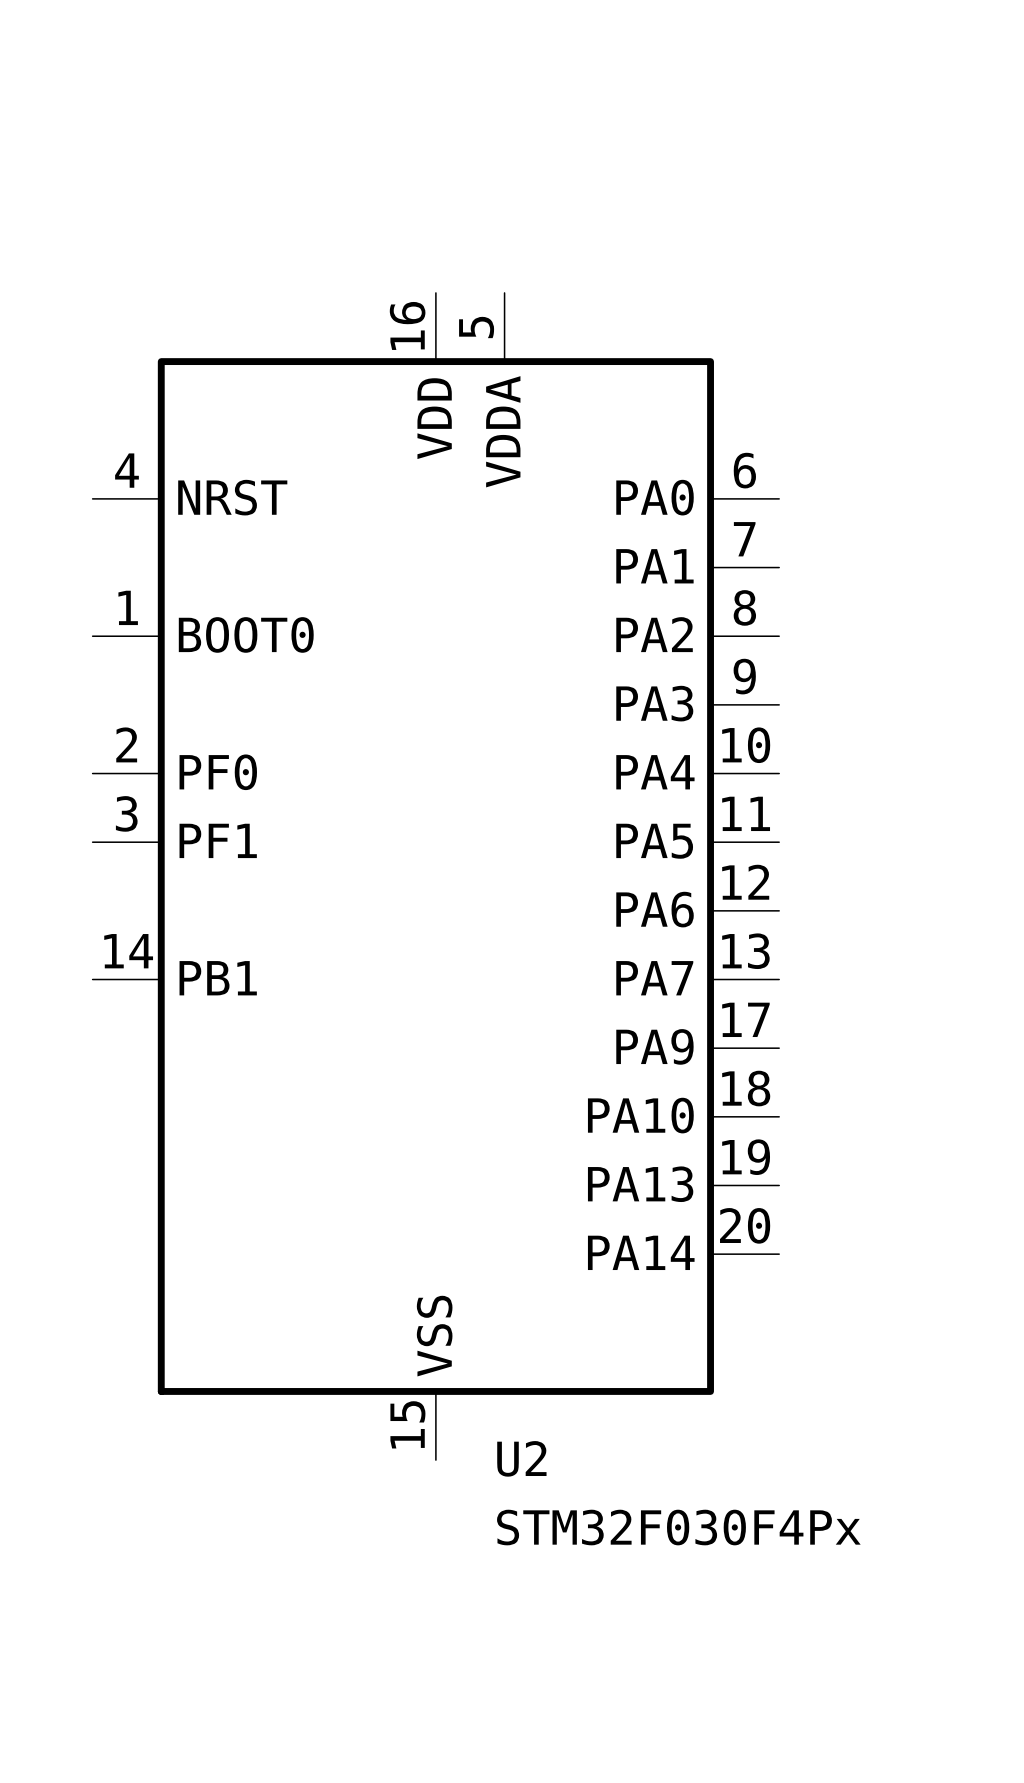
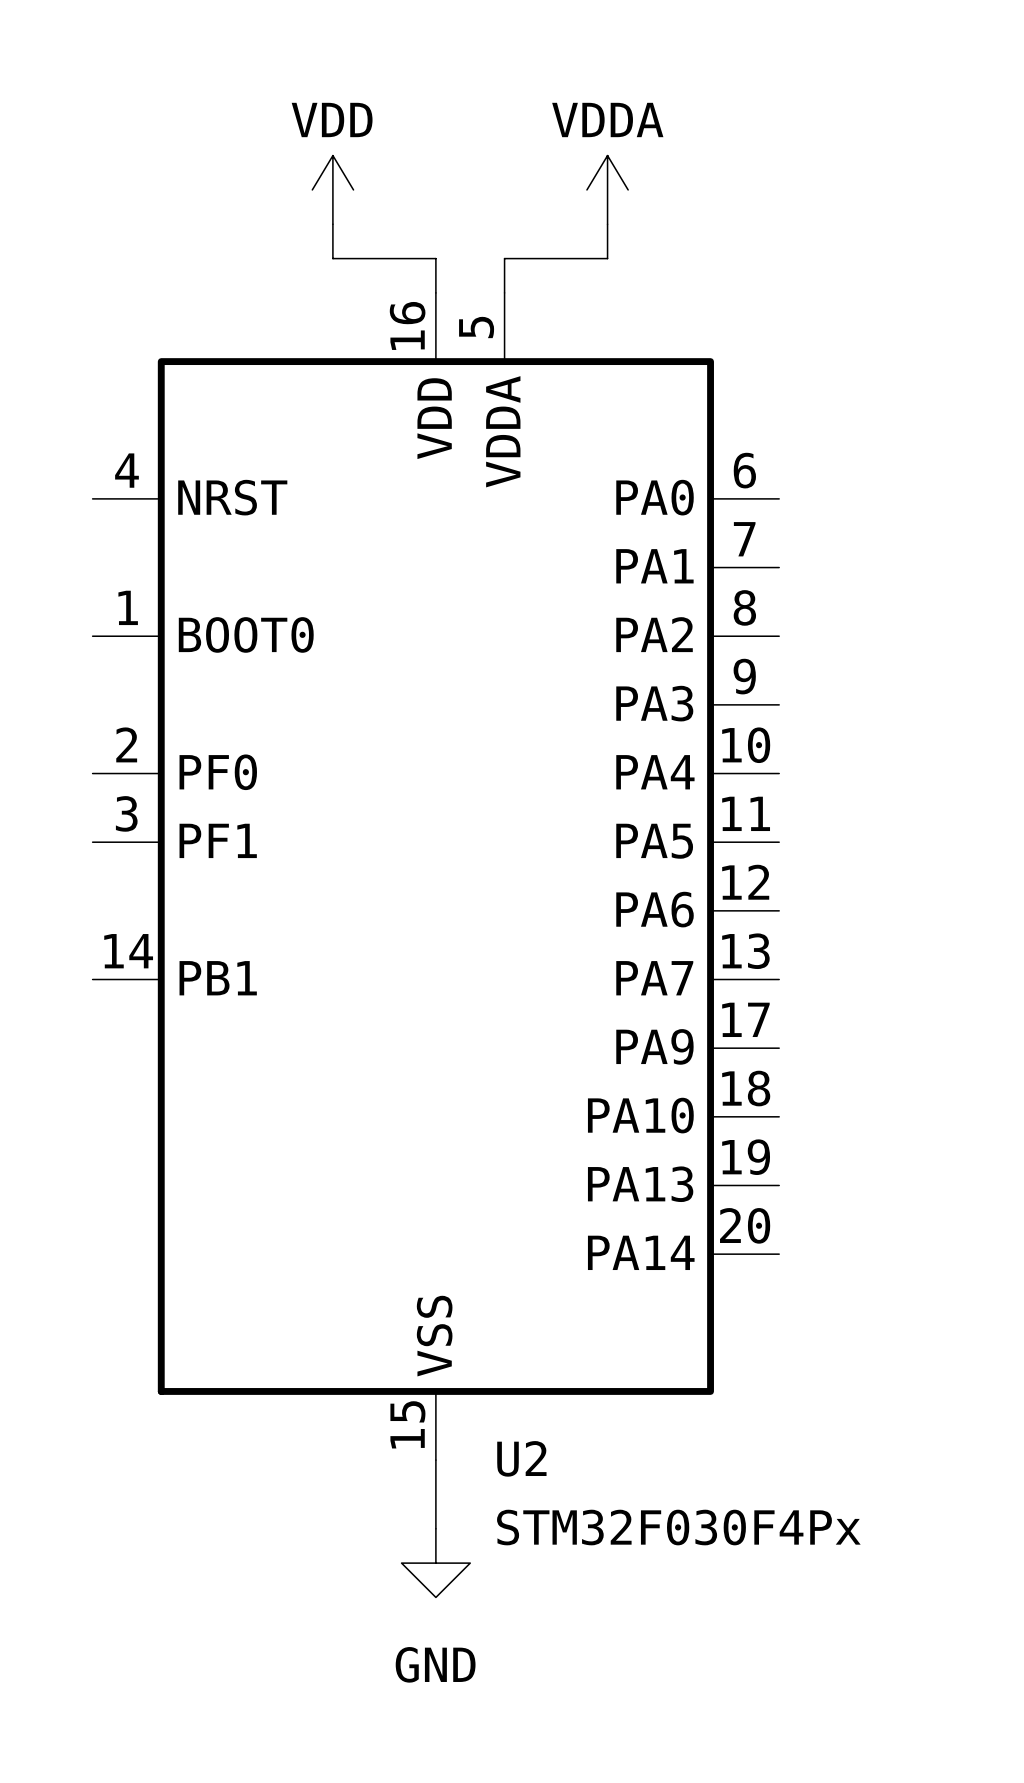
power symbol: none -> VDD (332, 189)
power symbol: none -> VDDA (607, 189)
wire: none -> (332, 224) (332, 258) (435, 258) (435, 292)
wire: none -> (607, 224) (607, 258) (504, 258) (504, 292)
wire: none -> (435, 1460) (435, 1528)
power symbol: none -> GND (435, 1563)

